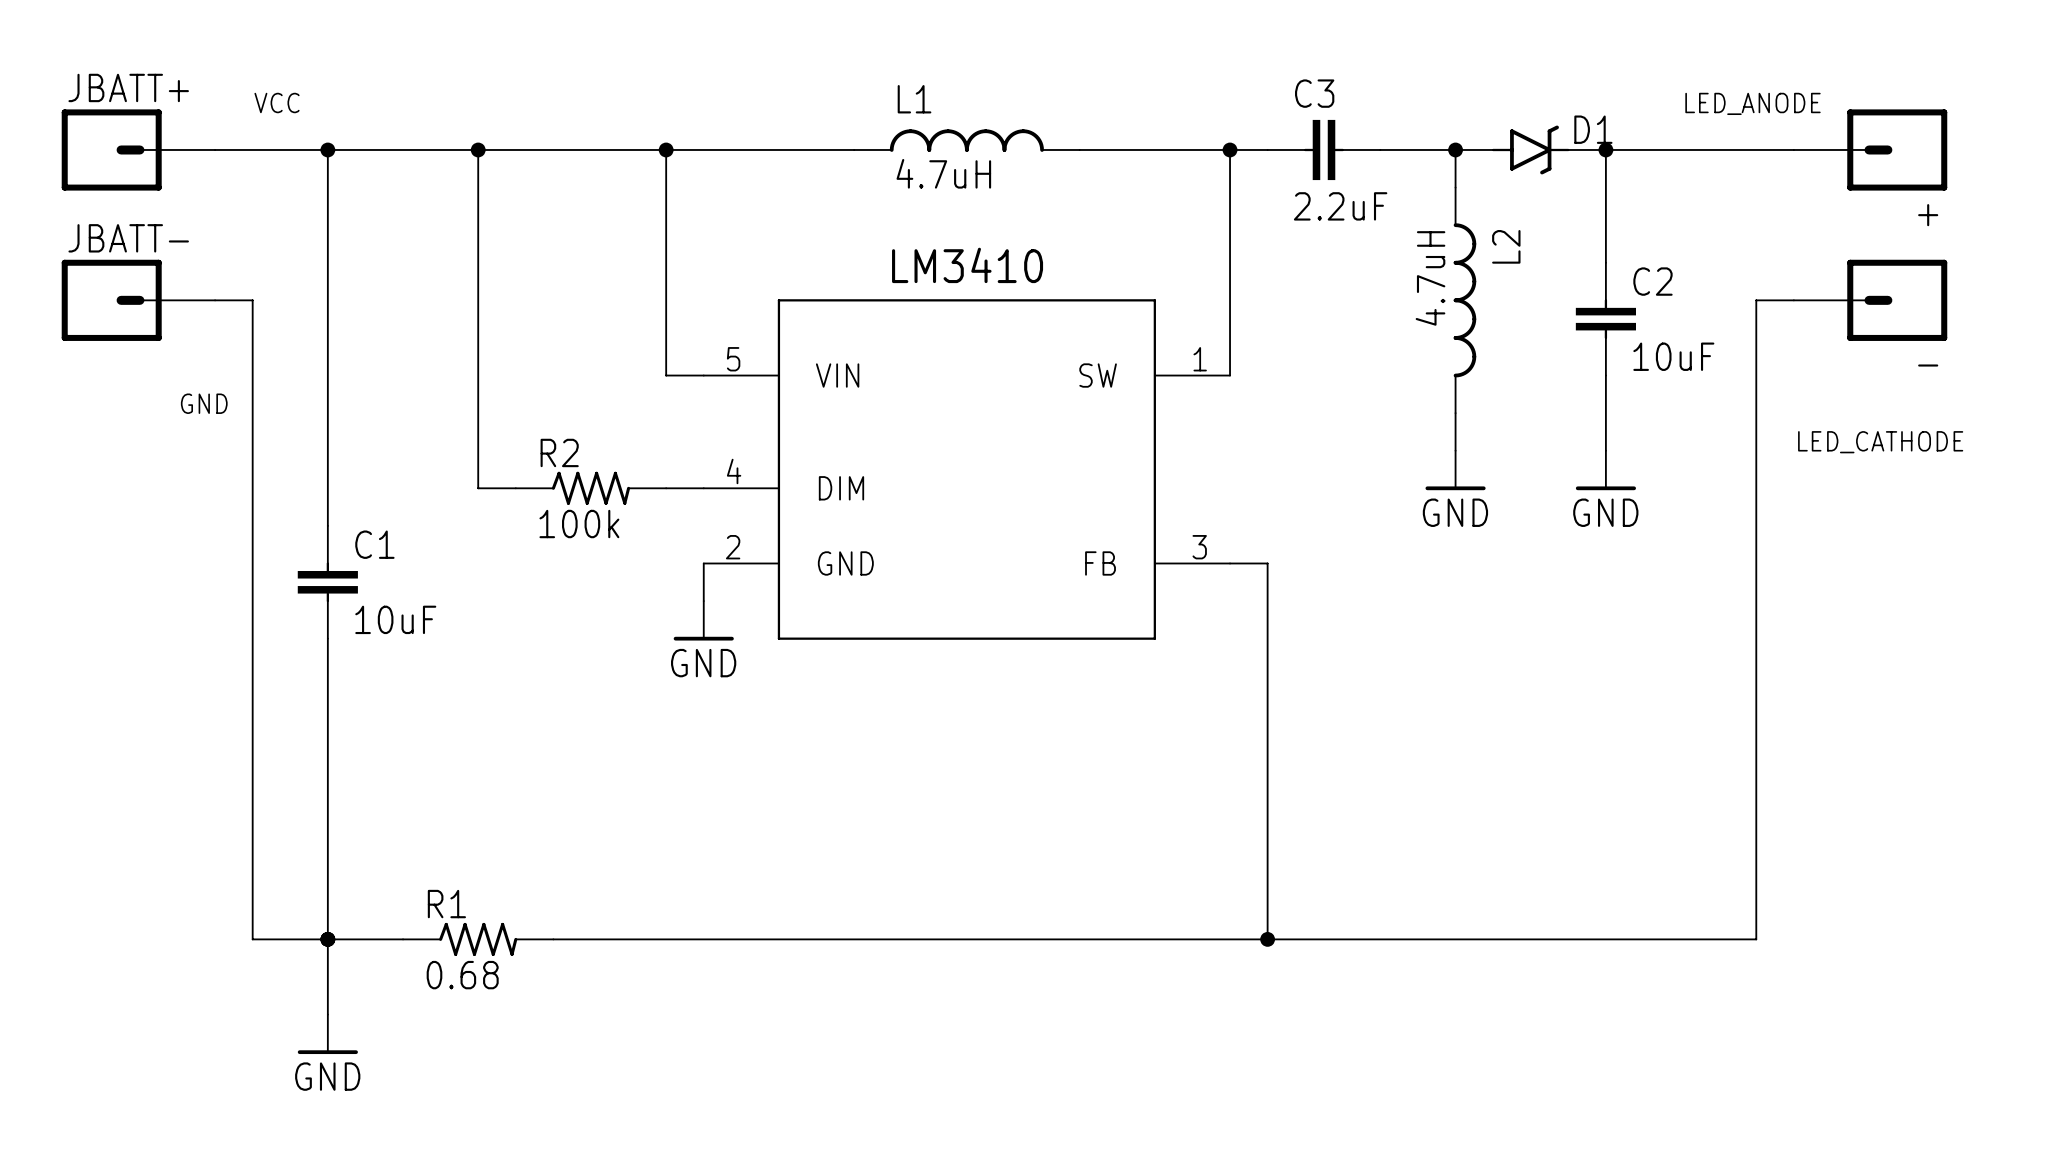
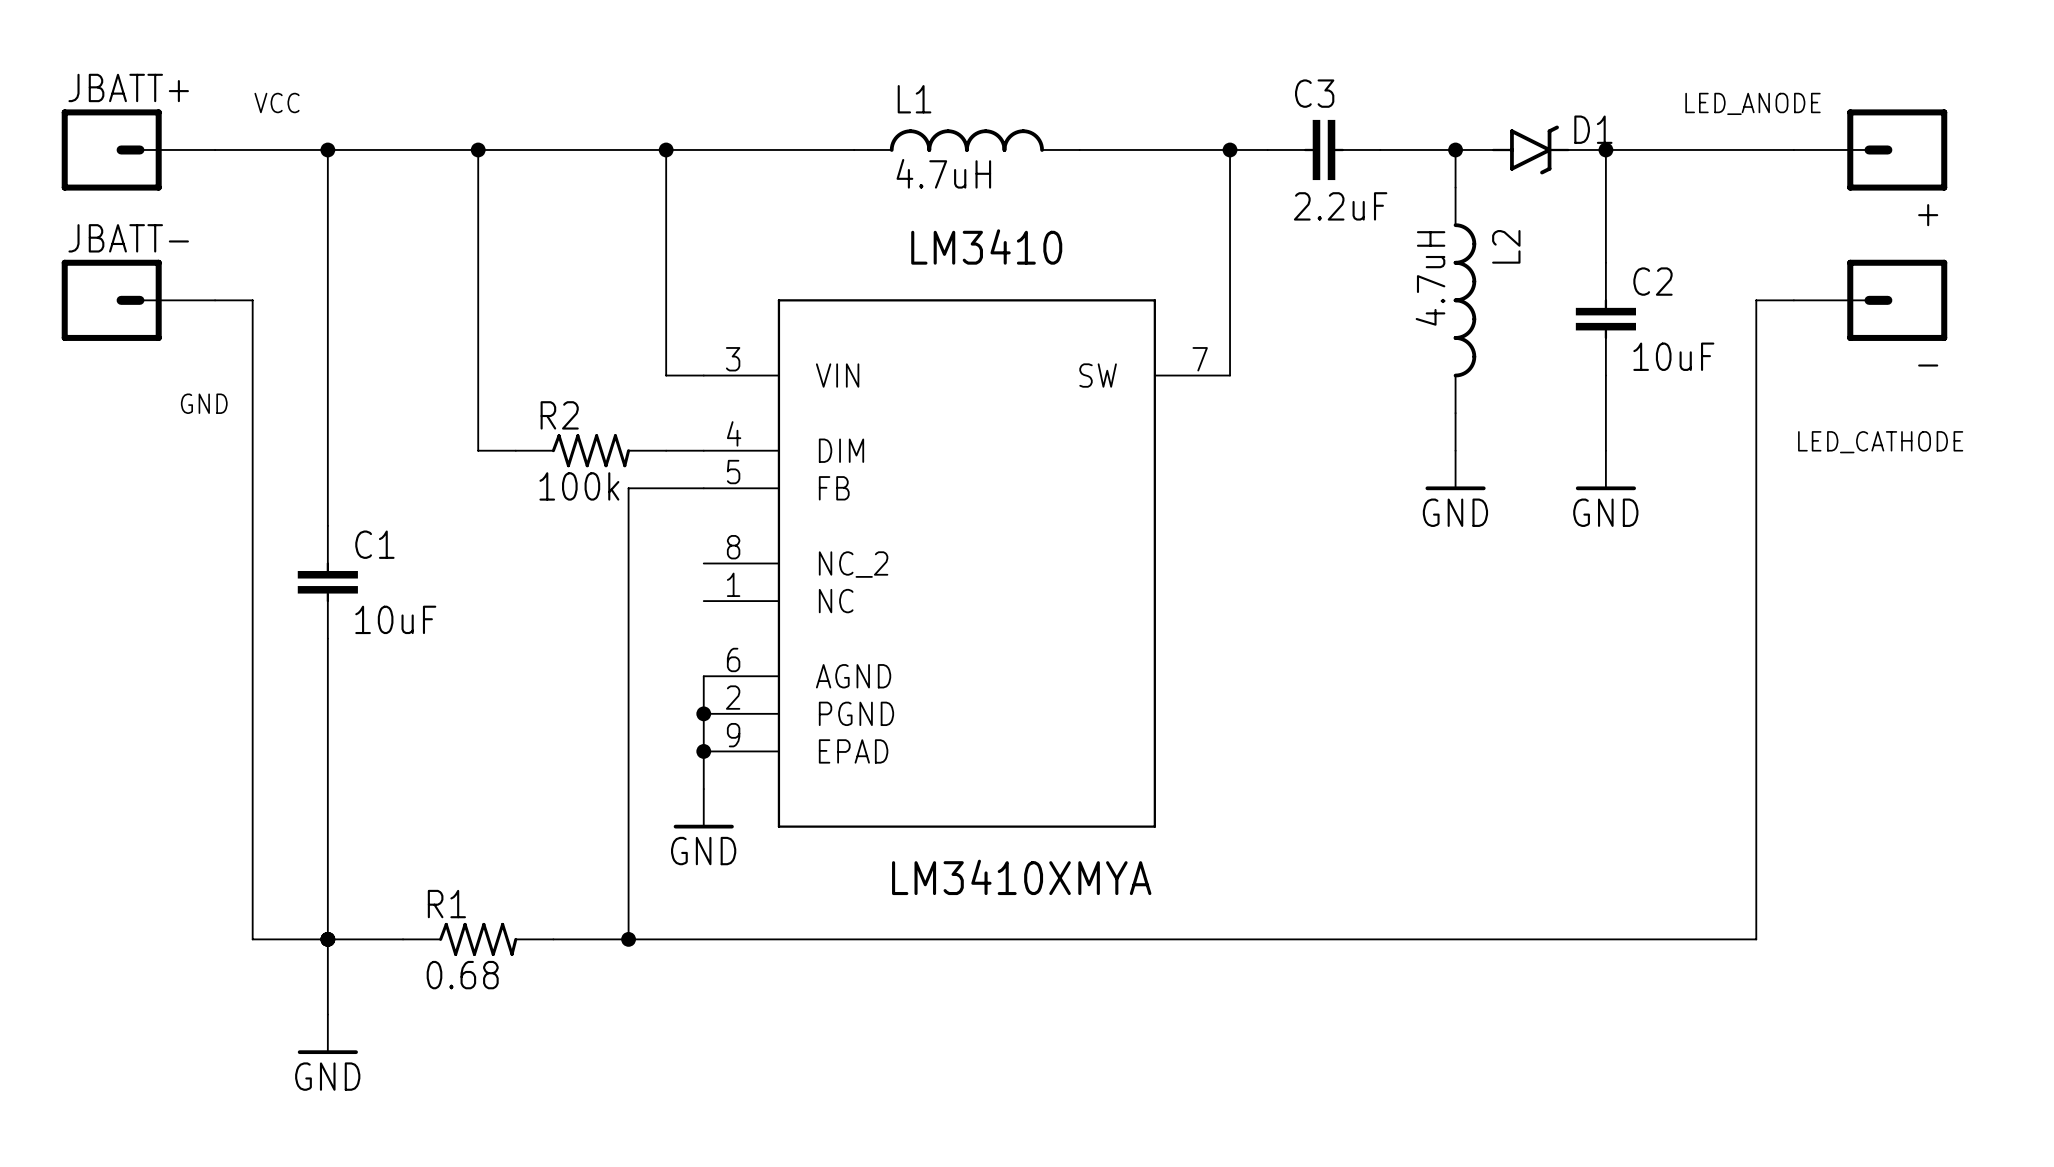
LM3410 name position: LM3410 (967, 265) -> LM3410 (986, 246)
LM3410 symbol: [703, 299, 1231, 640] -> [703, 299, 1231, 828]
wire: (478, 450) (478, 488) (515, 488) -> (478, 450) (515, 450)
wire: none -> (666, 450) (703, 450)
R2 position: (590, 488) -> (590, 450)
wire: none -> (666, 488) (628, 488) (628, 939)
wire: (703, 563) (703, 601) -> none
wire: (1230, 563) (1267, 563) (1267, 939) -> none
power symbol position: GND (703, 620) -> GND (703, 808)
wire: none -> (703, 676) (703, 789)
junction: none -> (703, 713)
junction: none -> (703, 751)
LM3410 value: none -> LM3410XMYA (1021, 877)
junction: none -> (628, 939)
junction: (1267, 939) -> none

